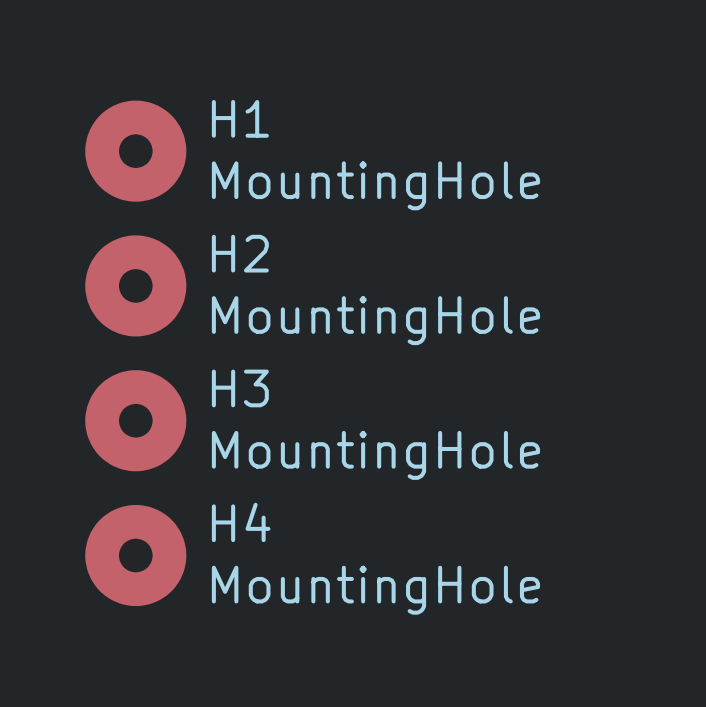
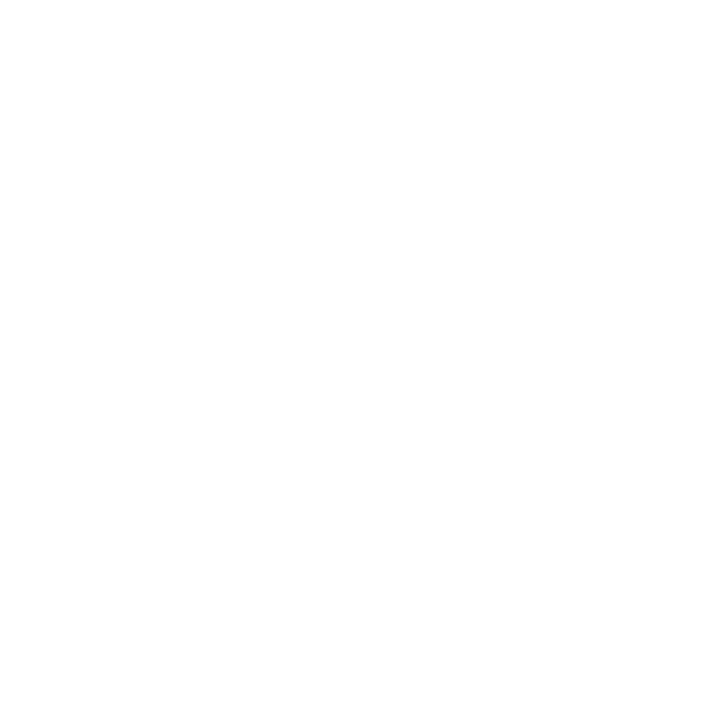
H1: MountingHole (135, 151) -> none
H2: MountingHole (135, 285) -> none
H3: MountingHole (135, 420) -> none
H4: MountingHole (135, 555) -> none

